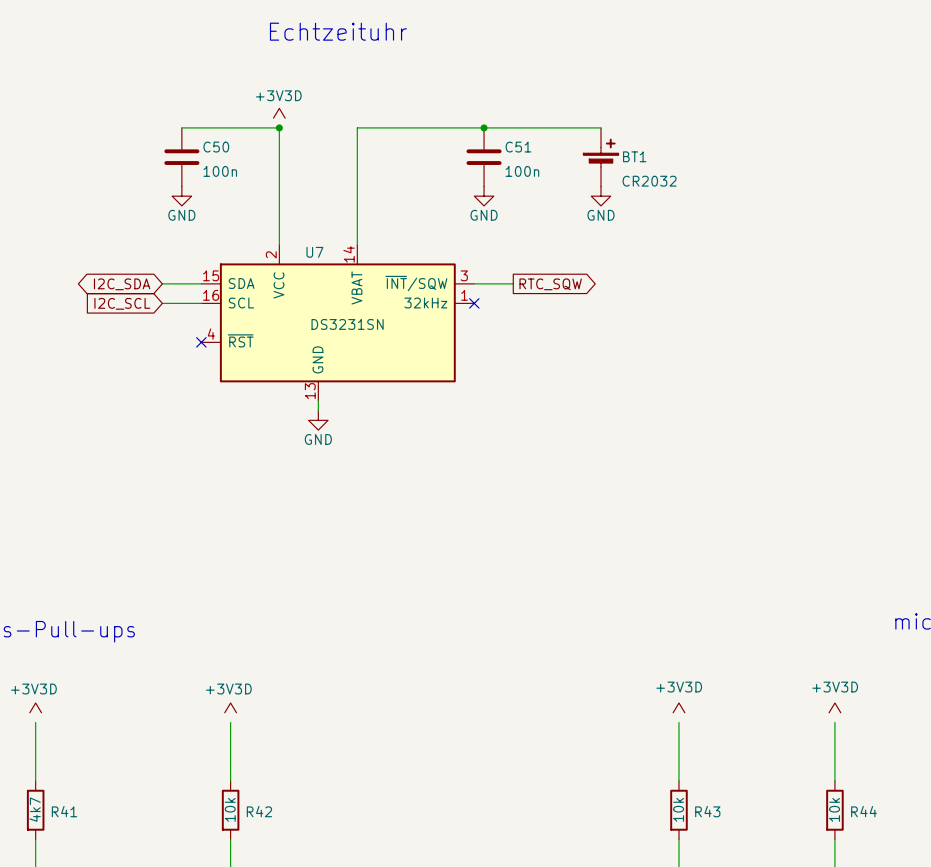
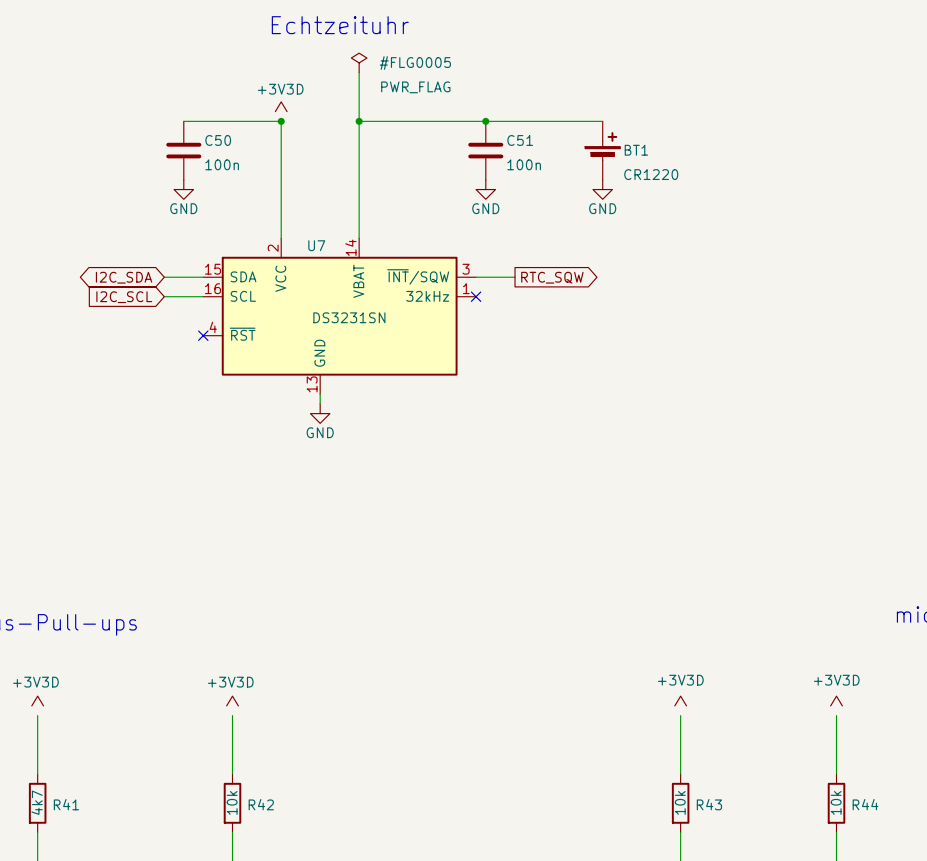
#FLG0005: none -> PWR_FLAG (359, 62)
wire: none -> (359, 72) (359, 121)
junction: none -> (359, 121)
BT1 value: CR2032 (649, 181) -> CR1220 (651, 174)

